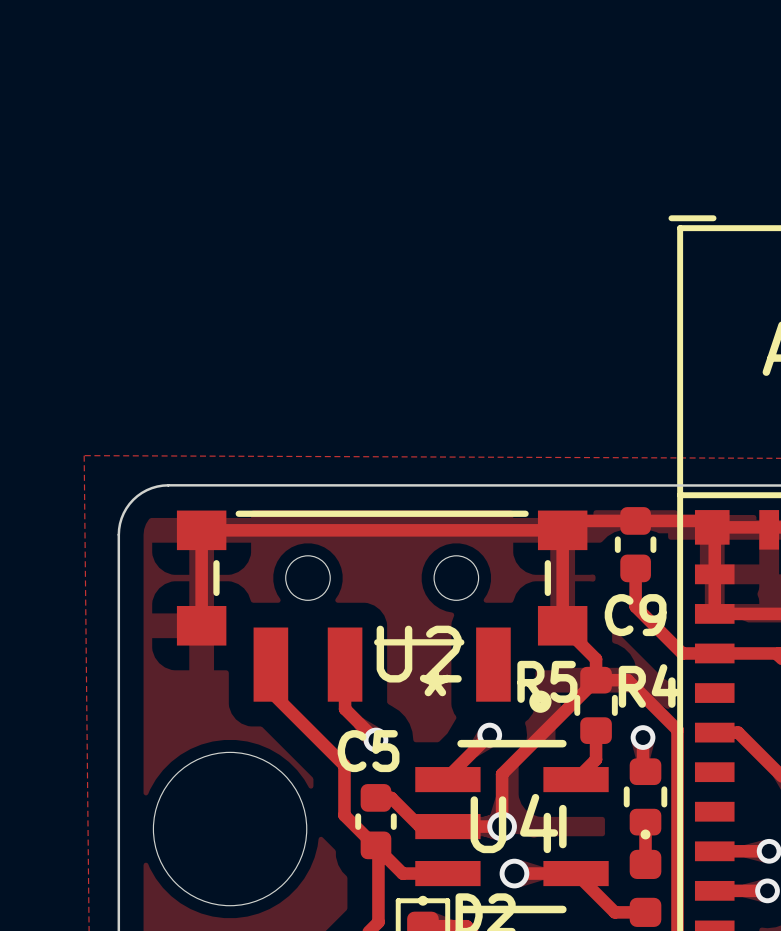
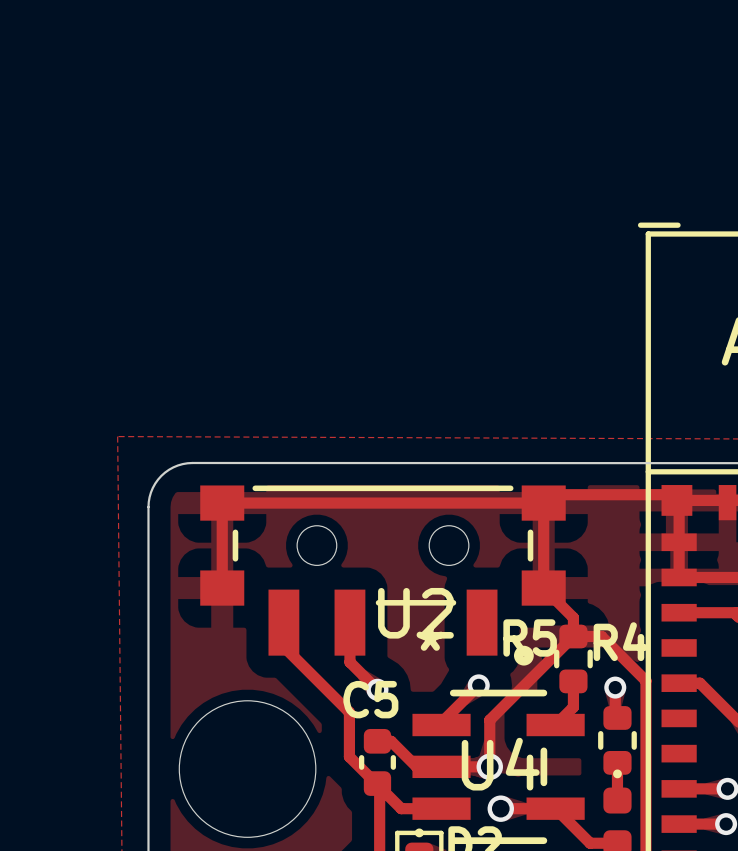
C9: (635, 544) -> none
track: (635, 568) (635, 606) (682, 653) (714, 653) -> none

